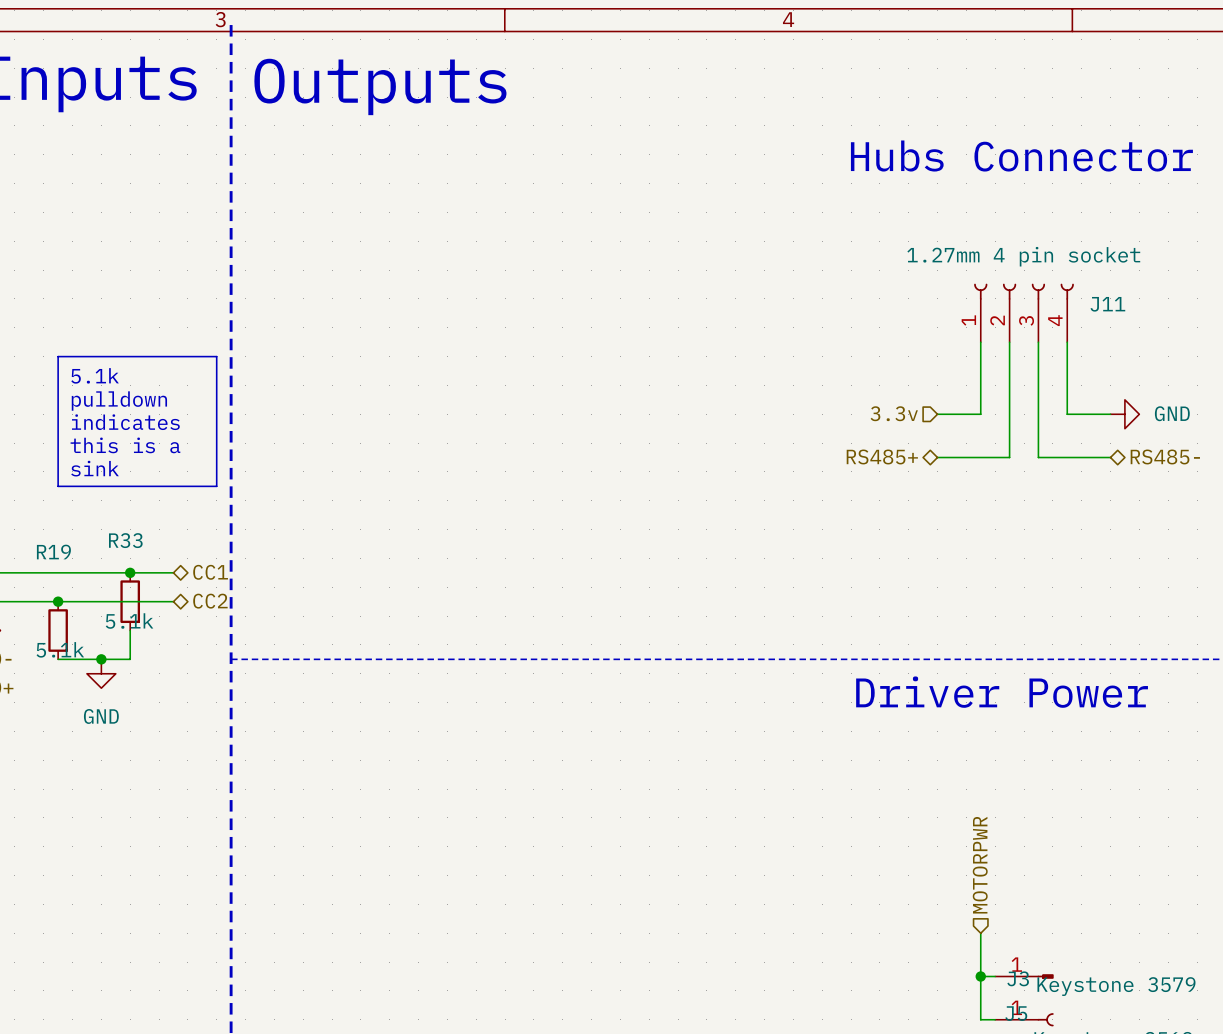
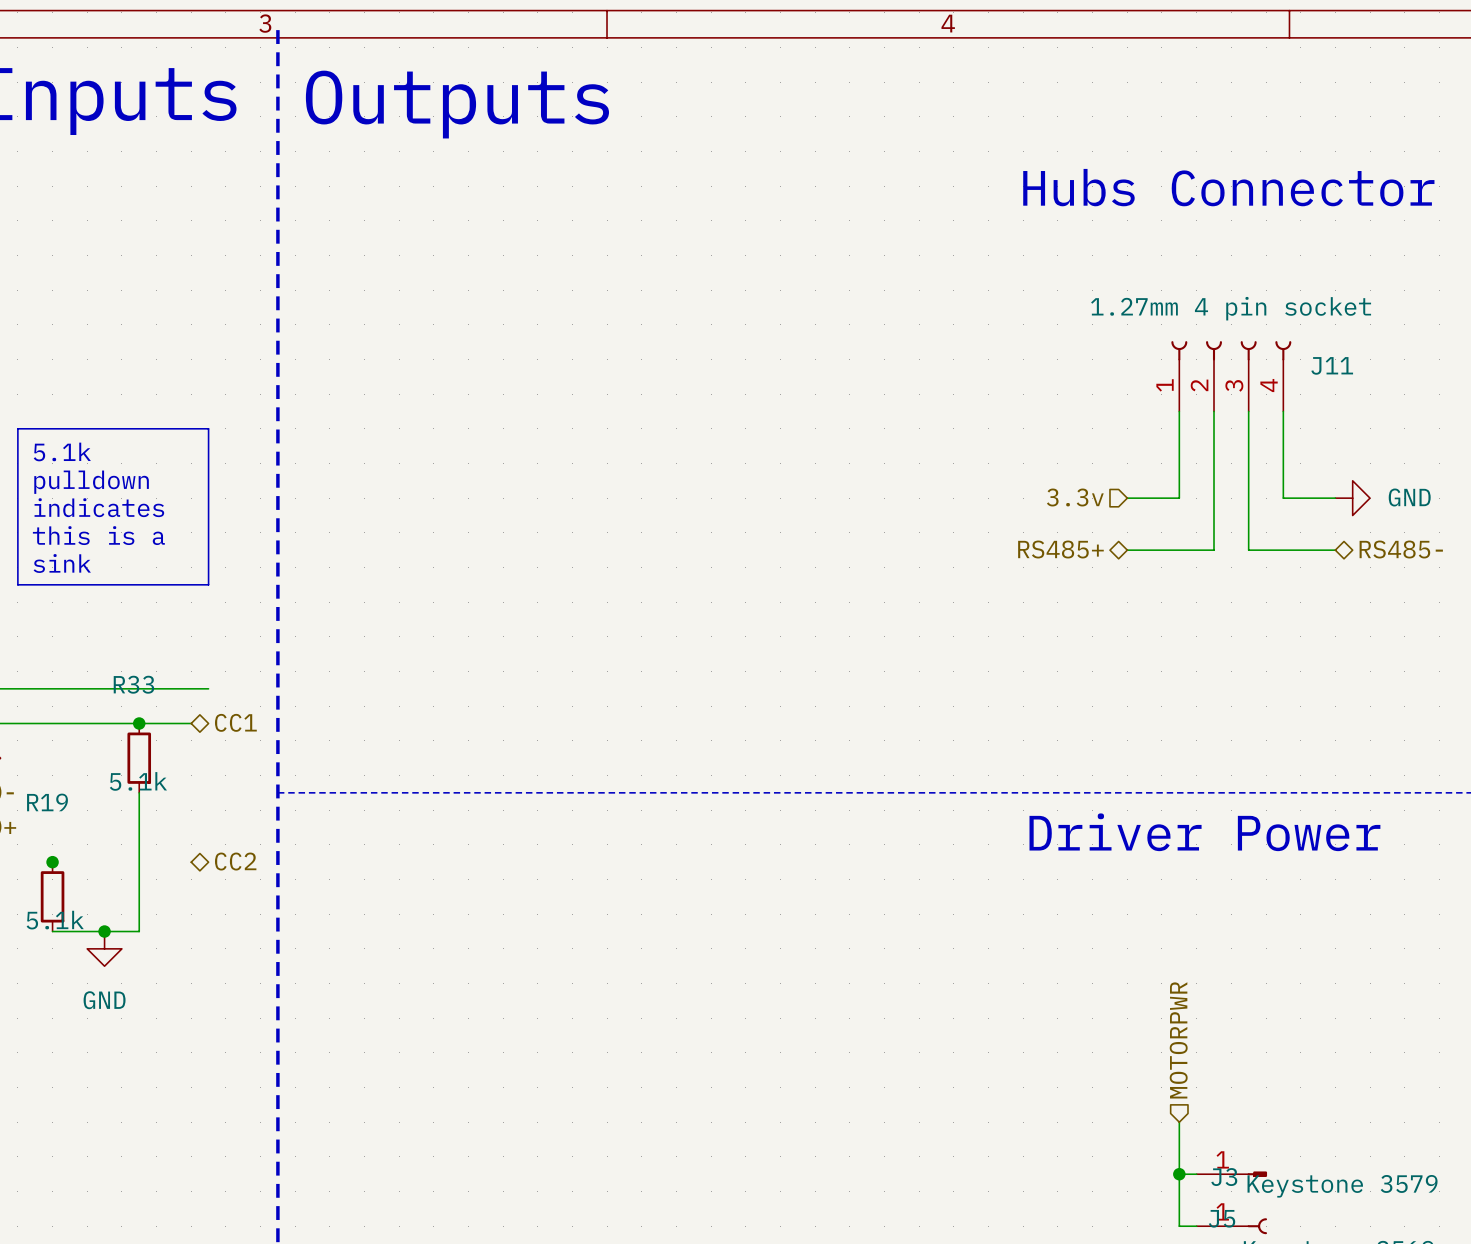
line: (58, 356) (58, 486) -> (69, 428) (17, 428) (17, 584) (69, 584)
line: (173, 356) (216, 356) (216, 486) (173, 486) -> (208, 428) (208, 584)
text position: 5.1k (95, 375) -> 5.1k (62, 451)
text position: pulldown (119, 401) -> pulldown (91, 482)
text position: indicates (125, 422) -> indicates (99, 507)
text position: this is a (125, 445) -> this is a (98, 535)
text position: sink (95, 468) -> sink (62, 563)
junction: (130, 572) -> none
hierarchical label position: CC1 (210, 572) -> CC1 (235, 722)
junction: (58, 601) -> none
junction: none -> (139, 723)
R33 position: (130, 601) -> (139, 758)
wire: (159, 601) (173, 601) -> none
hierarchical label position: CC2 (210, 601) -> CC2 (235, 861)
R19 position: (58, 630) -> (52, 896)
wire: (130, 630) (130, 659) (58, 659) -> none
junction: (101, 659) -> none
wire: none -> (139, 792) (139, 931) (52, 931)
power symbol position: GND (101, 673) -> GND (104, 948)
junction: none -> (52, 862)
junction: none -> (104, 931)

